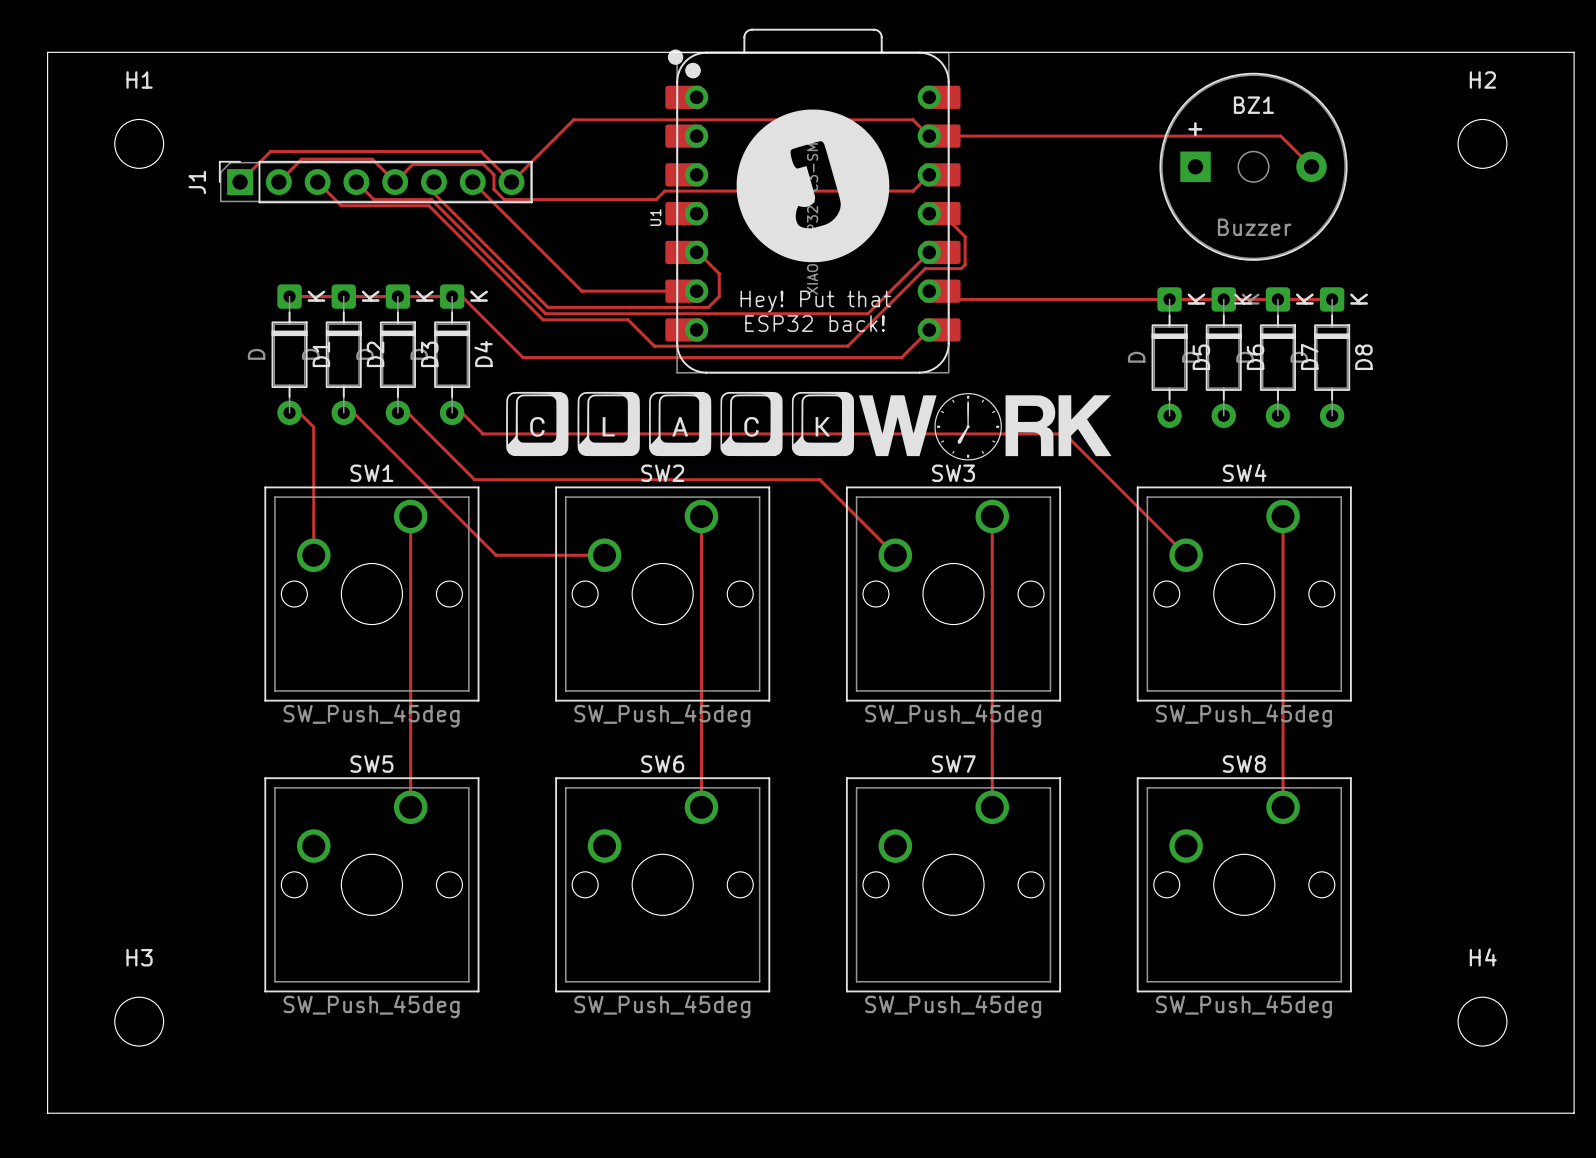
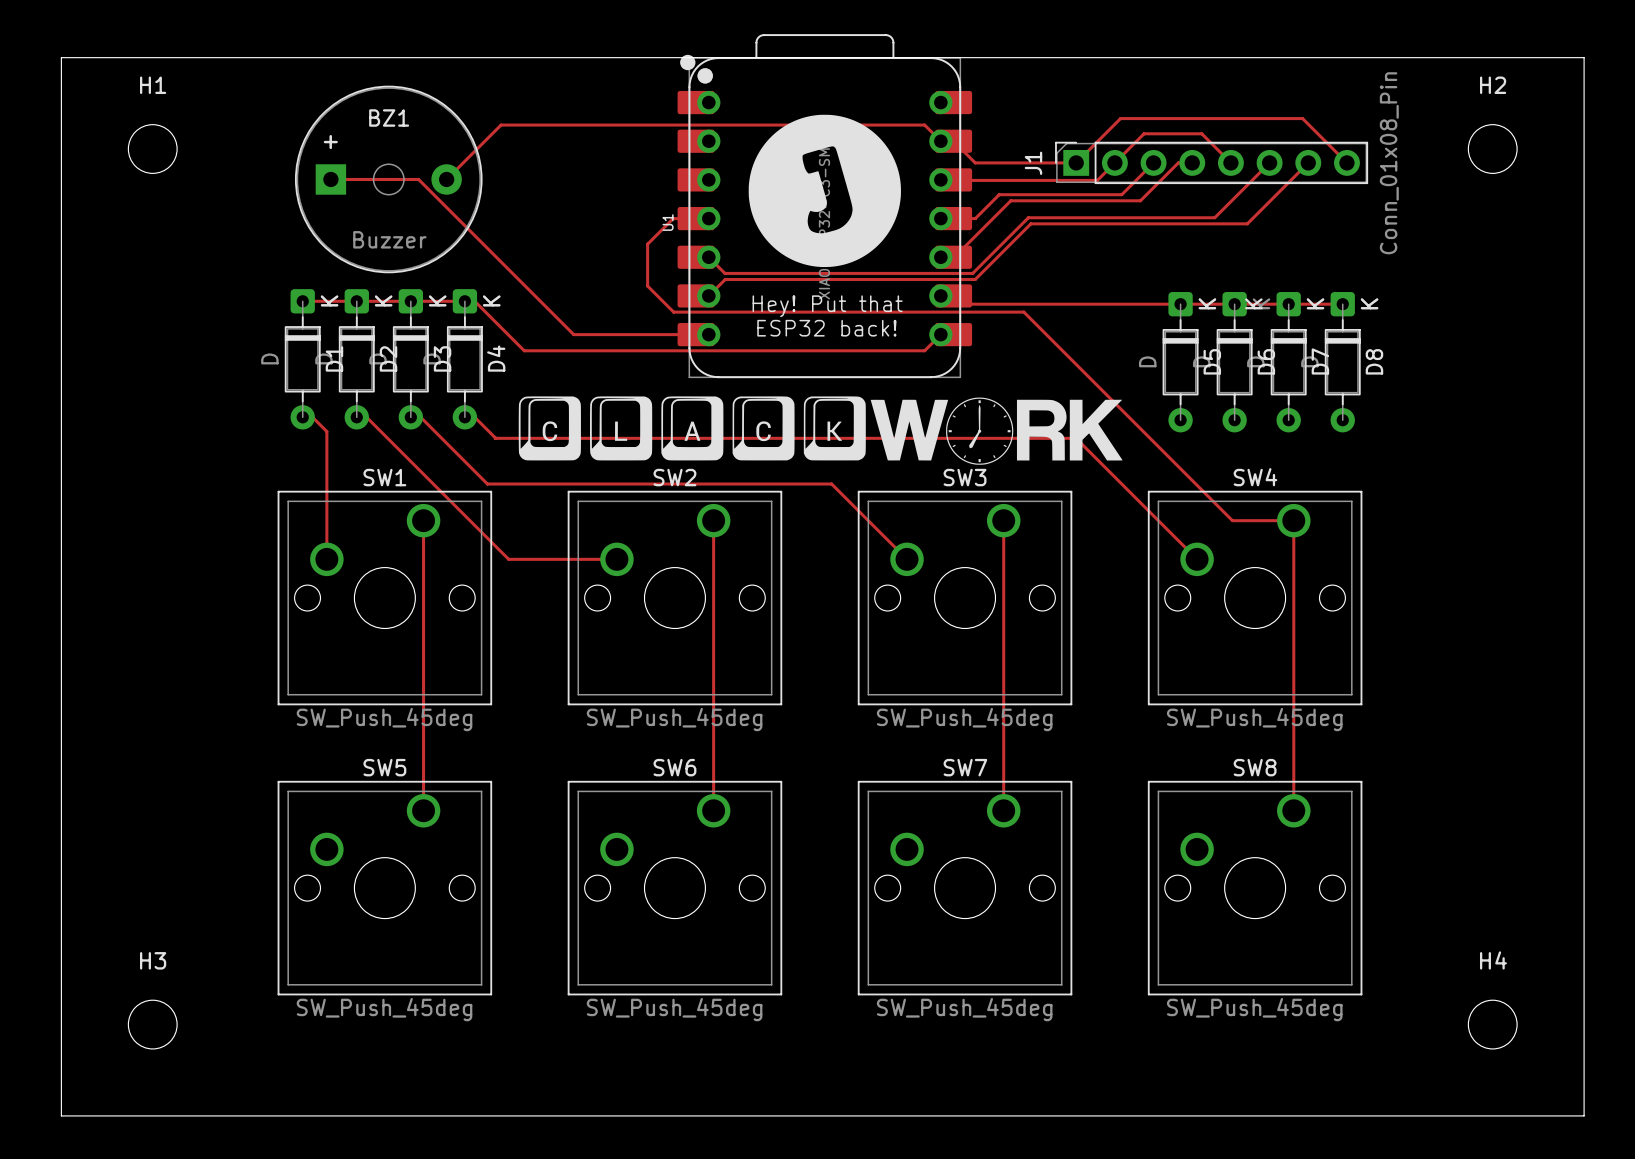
track: (573, 119) (511, 182) (480, 151) (270, 151) (240, 182) -> (586, 125) (501, 125) (446, 179)
track: (942, 136) (1280, 136) (1311, 166) -> (953, 141) (975, 162) (1076, 162) (1120, 118) (1302, 118) (1346, 162)
track: none -> (1192, 162) (1178, 162) (1140, 200) (1010, 200) (954, 257)
track: none -> (1230, 162) (1201, 133) (1144, 133) (1097, 180) (954, 180)
track: none -> (1269, 162) (1214, 217) (1028, 217) (976, 269)
track: none -> (1308, 162) (1247, 223) (1030, 223) (975, 279) (725, 279) (708, 295)
J1 value: none -> Conn_01x08_Pin (1389, 163)
BZ1 position: (1253, 166) -> (388, 179)
track: none -> (330, 179) (361, 179)
track: none -> (375, 179) (418, 179) (573, 334) (696, 334)
track: (929, 174) (913, 191) (664, 191) (656, 199) (504, 199) (493, 189) (493, 174) (483, 164) (412, 164) (395, 182) (372, 159) (301, 159) (278, 182) -> none
track: (317, 182) (341, 205) (428, 205) (543, 319) (628, 319) (654, 346) -> (524, 350) (666, 350)
track: (356, 182) (373, 199) (431, 199) (545, 313) (867, 313) (929, 252) -> none
J1 position: (375, 182) -> (1211, 162)
track: (433, 182) (433, 193) (547, 307) (661, 307) -> (696, 218) (673, 218) (647, 244) (647, 286) (673, 312)
track: (472, 182) (581, 291) (683, 291) -> none
track: (942, 213) (965, 236) (965, 264) -> (953, 218) (975, 218) (999, 194) (1121, 194) (1153, 162)
track: (696, 252) (719, 273) (719, 296) (708, 307) -> (708, 257) (724, 273) (936, 273)
track: (925, 268) (847, 346) -> (924, 350) (859, 350)
track: none -> (720, 312) (1023, 312) (1232, 520) (1293, 520)
track: (511, 346) (523, 357) (901, 357) (913, 346) -> none

